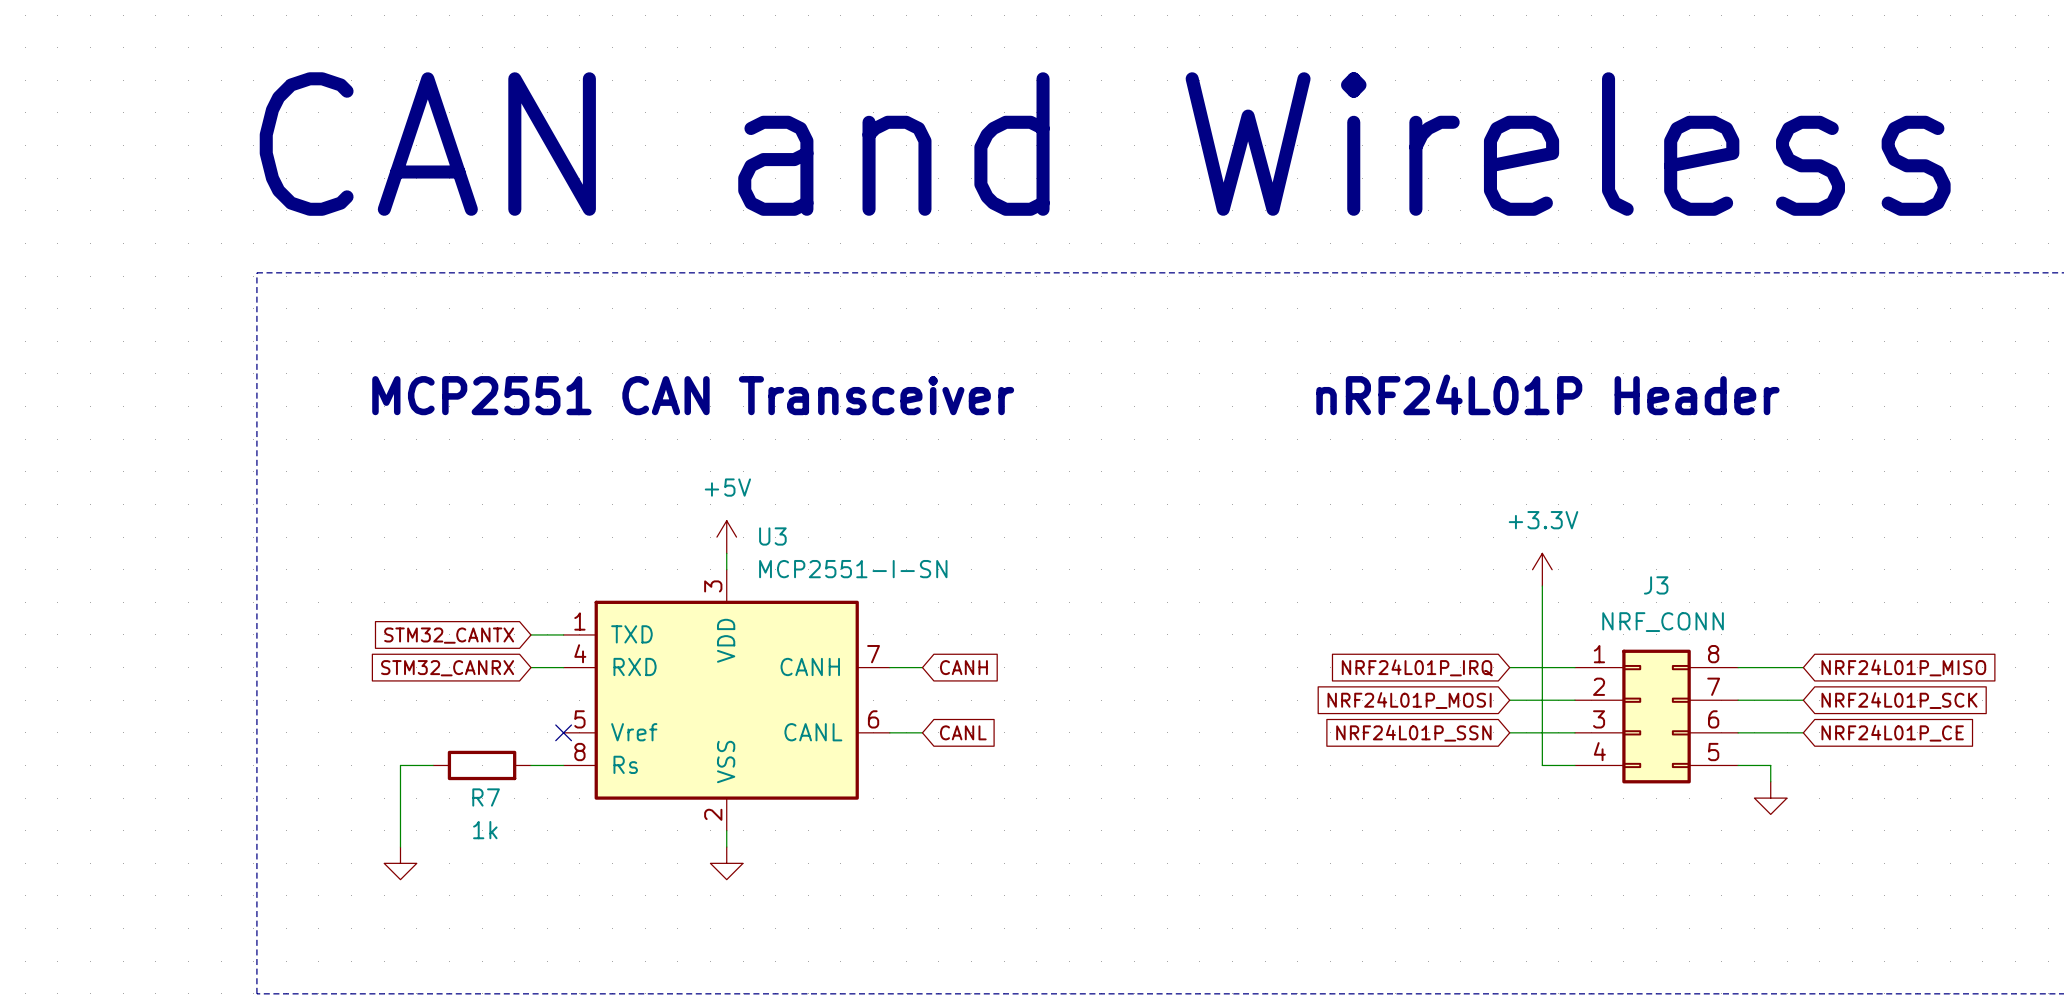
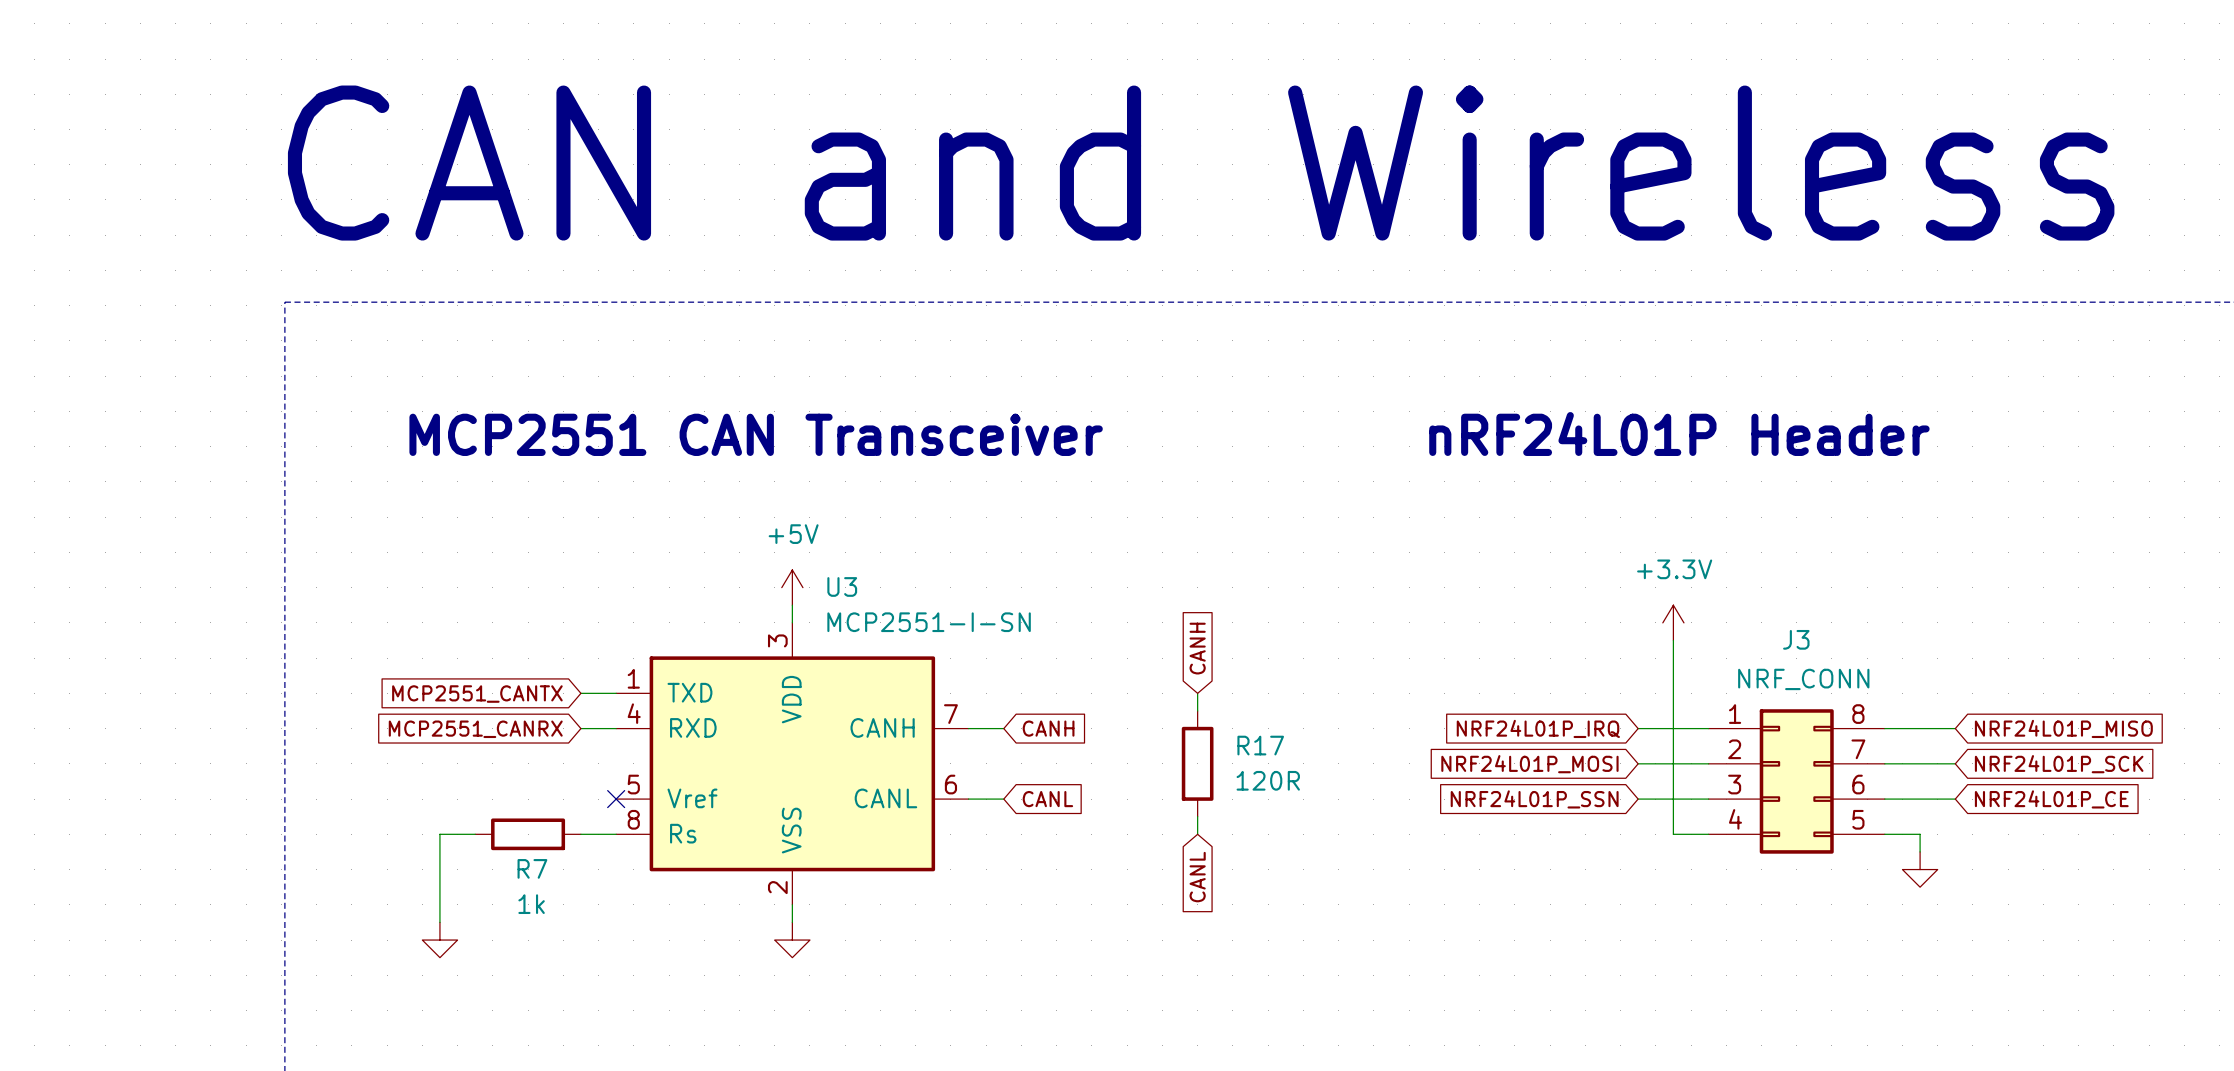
global label: none -> CANH (1197, 648)
wire: none -> (1197, 693) (1197, 710)
global label: STM32_CANTX (449, 635) -> MCP2551_CANTX (477, 694)
global label: STM32_CANRX (447, 668) -> MCP2551_CANRX (475, 729)
R17: none -> 120R (1197, 763)
wire: none -> (1197, 816) (1197, 834)
global label: none -> CANL (1197, 877)

